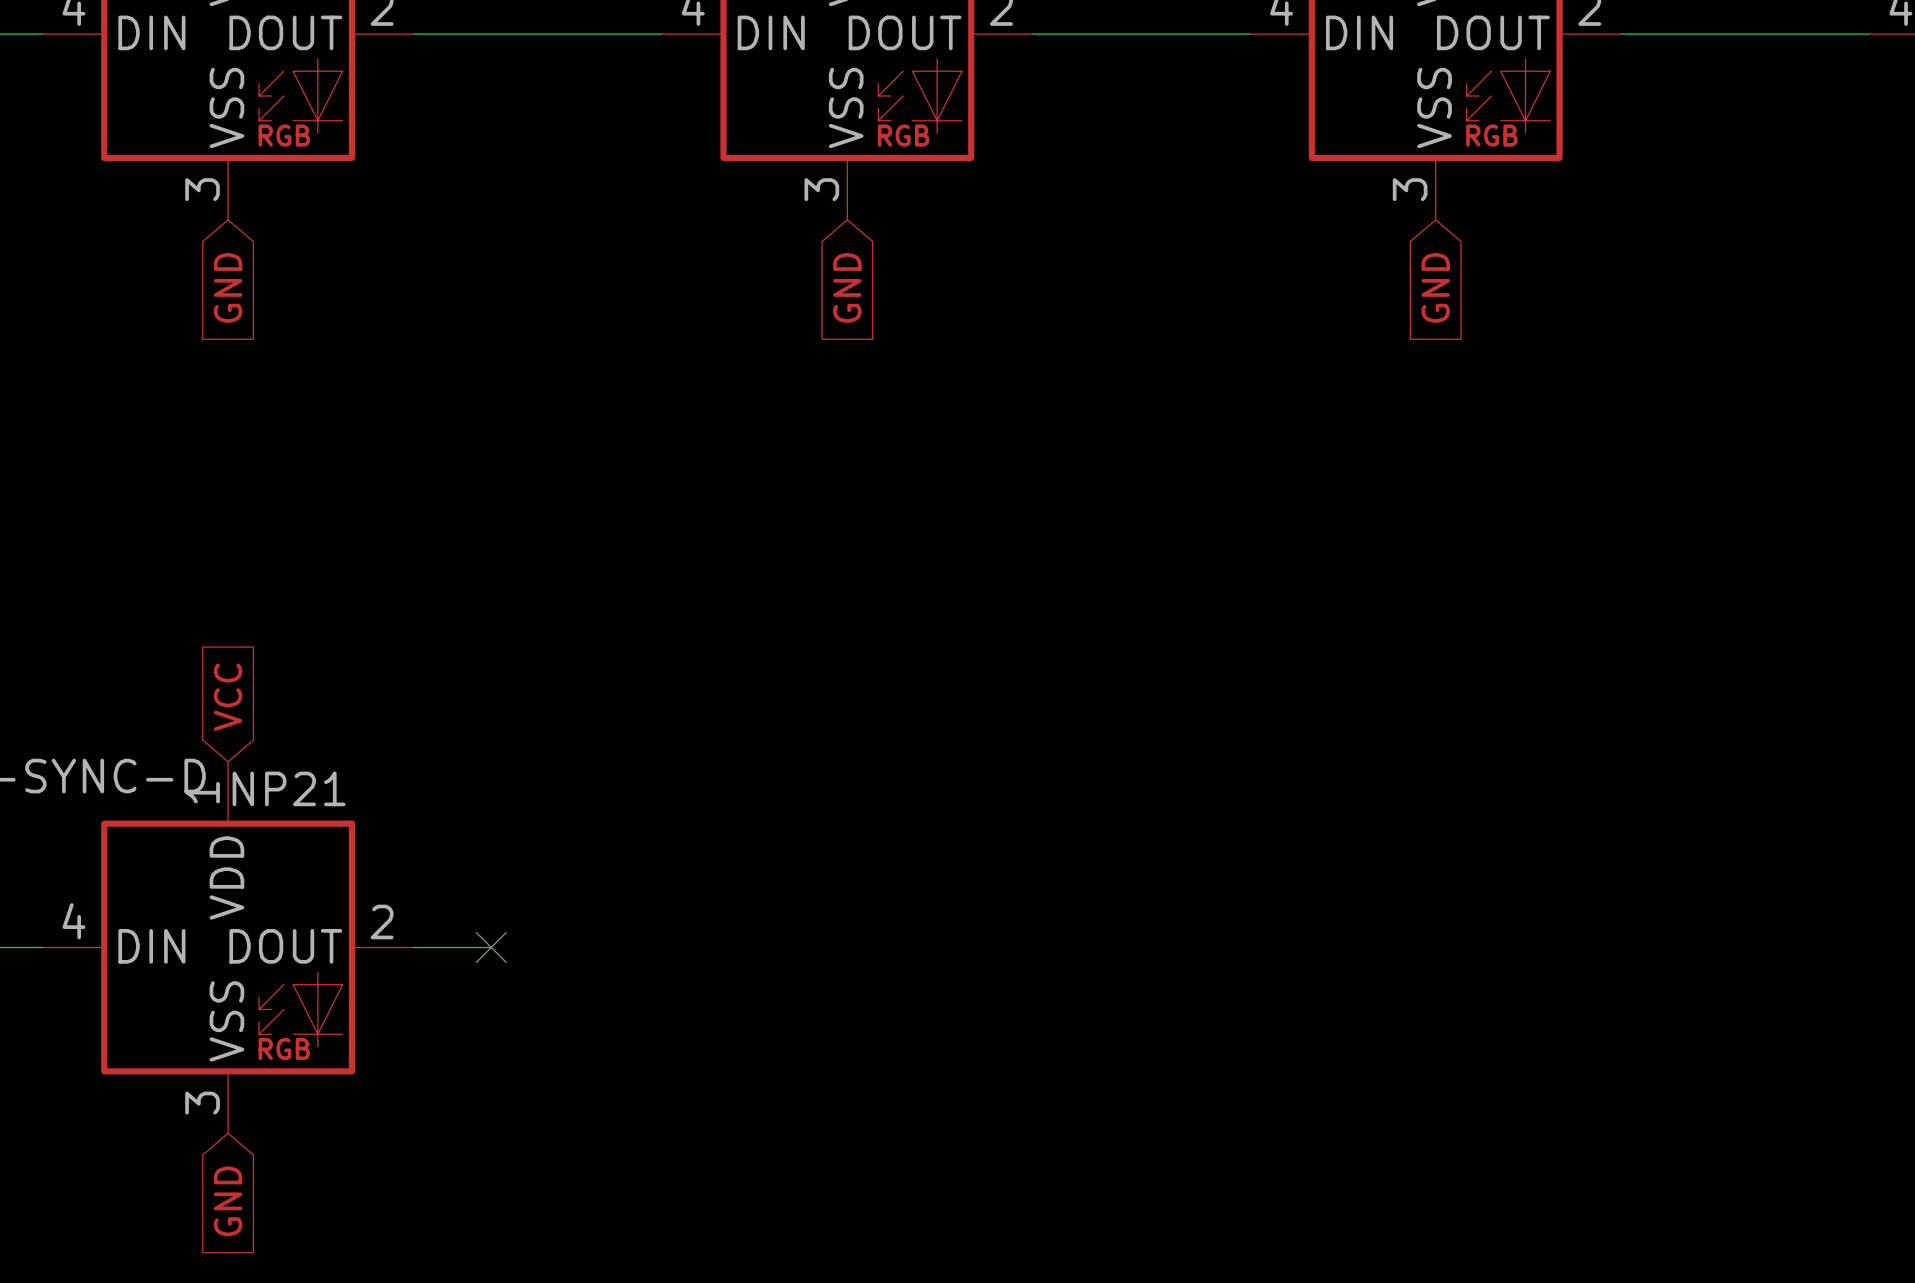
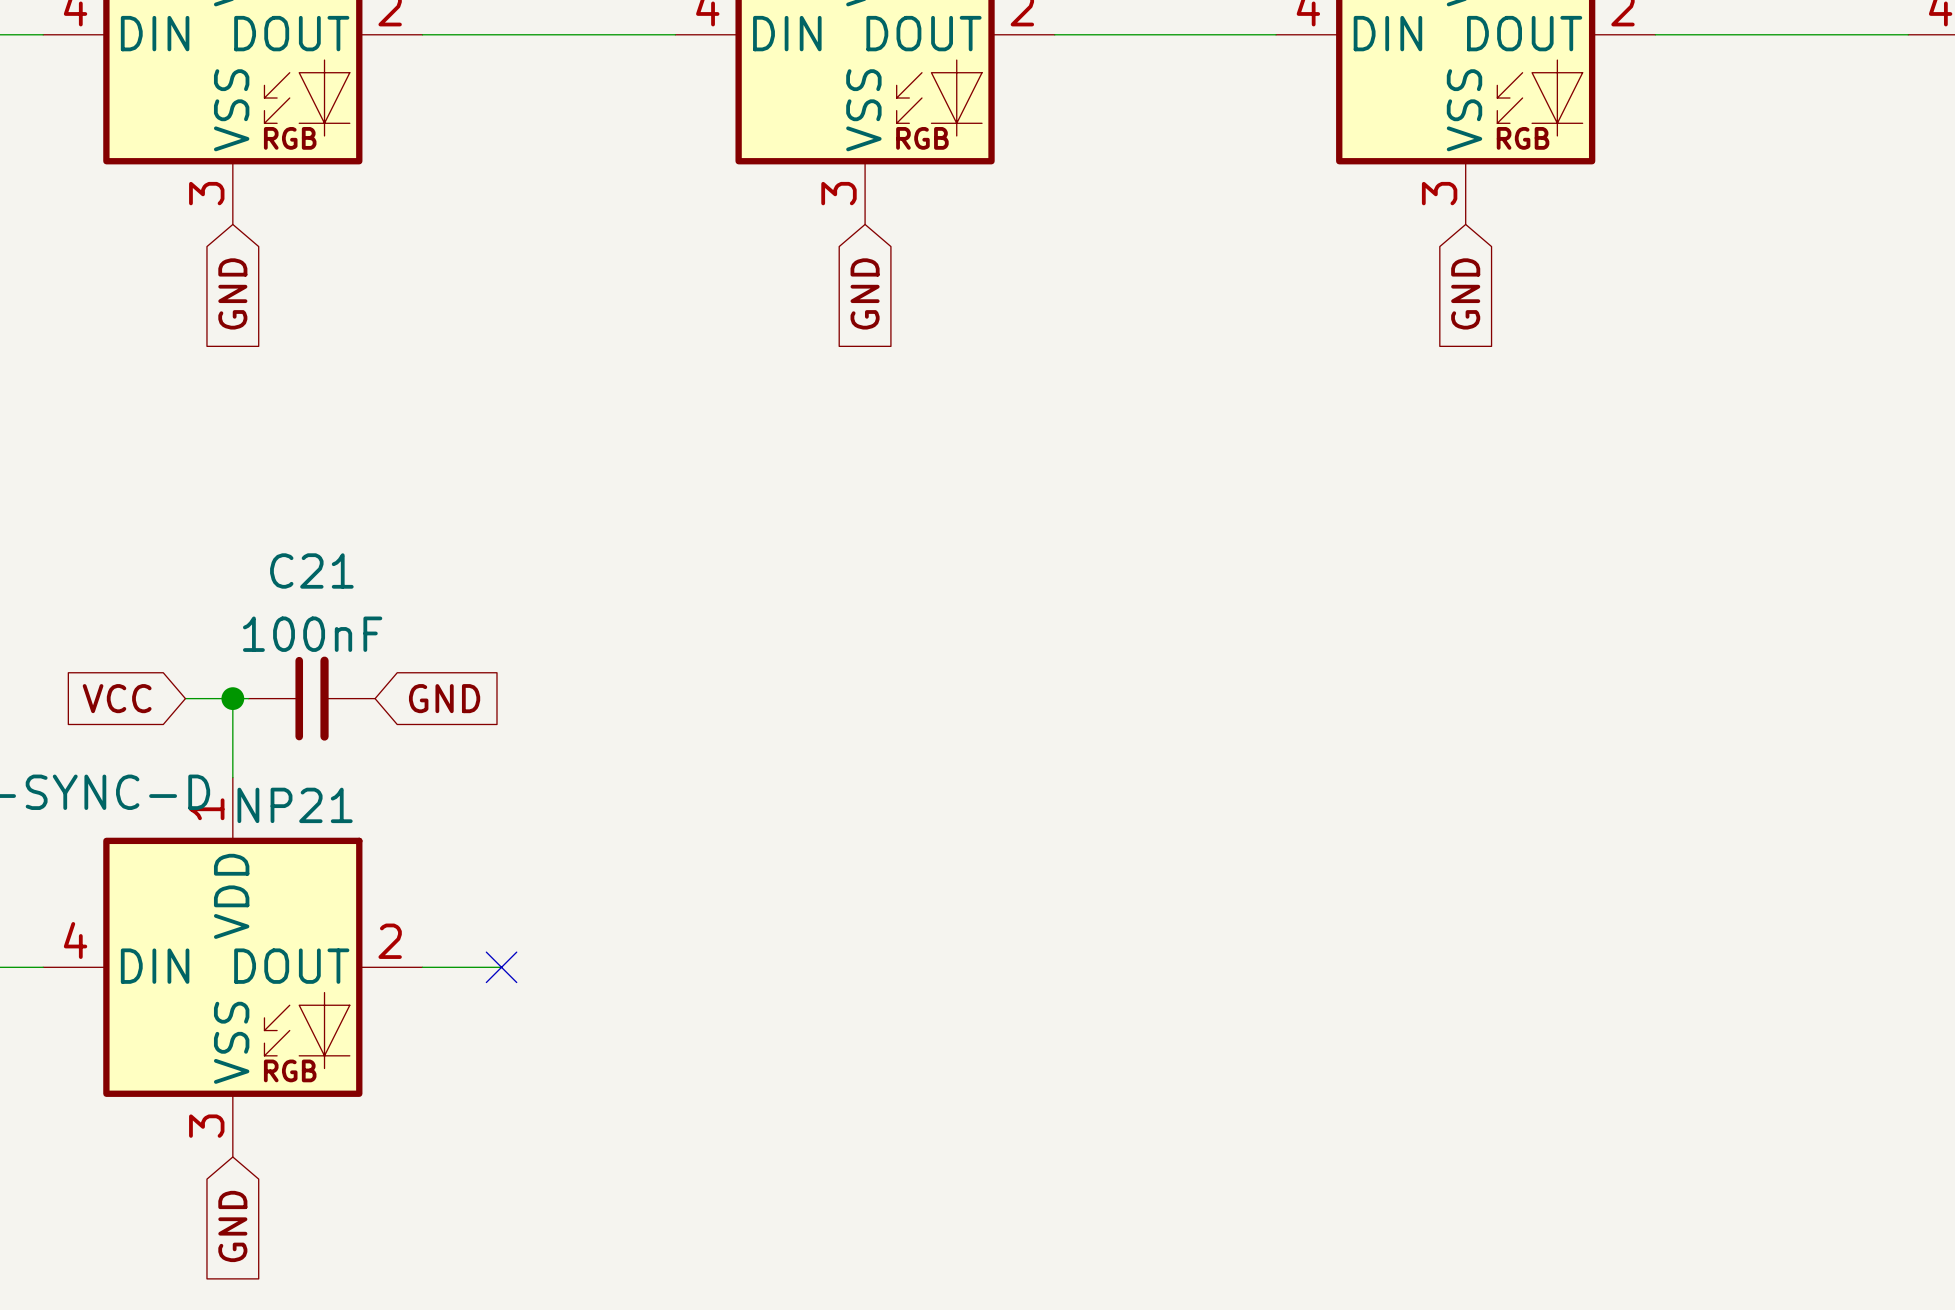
wire: none -> (185, 698) (248, 698)
wire: none -> (232, 698) (232, 777)
junction: none -> (232, 698)
C21: none -> 100nF (311, 698)
global label: none -> GND (444, 698)
global label rotation: 0° (228, 697) -> 90° counterclockwise (117, 698)

